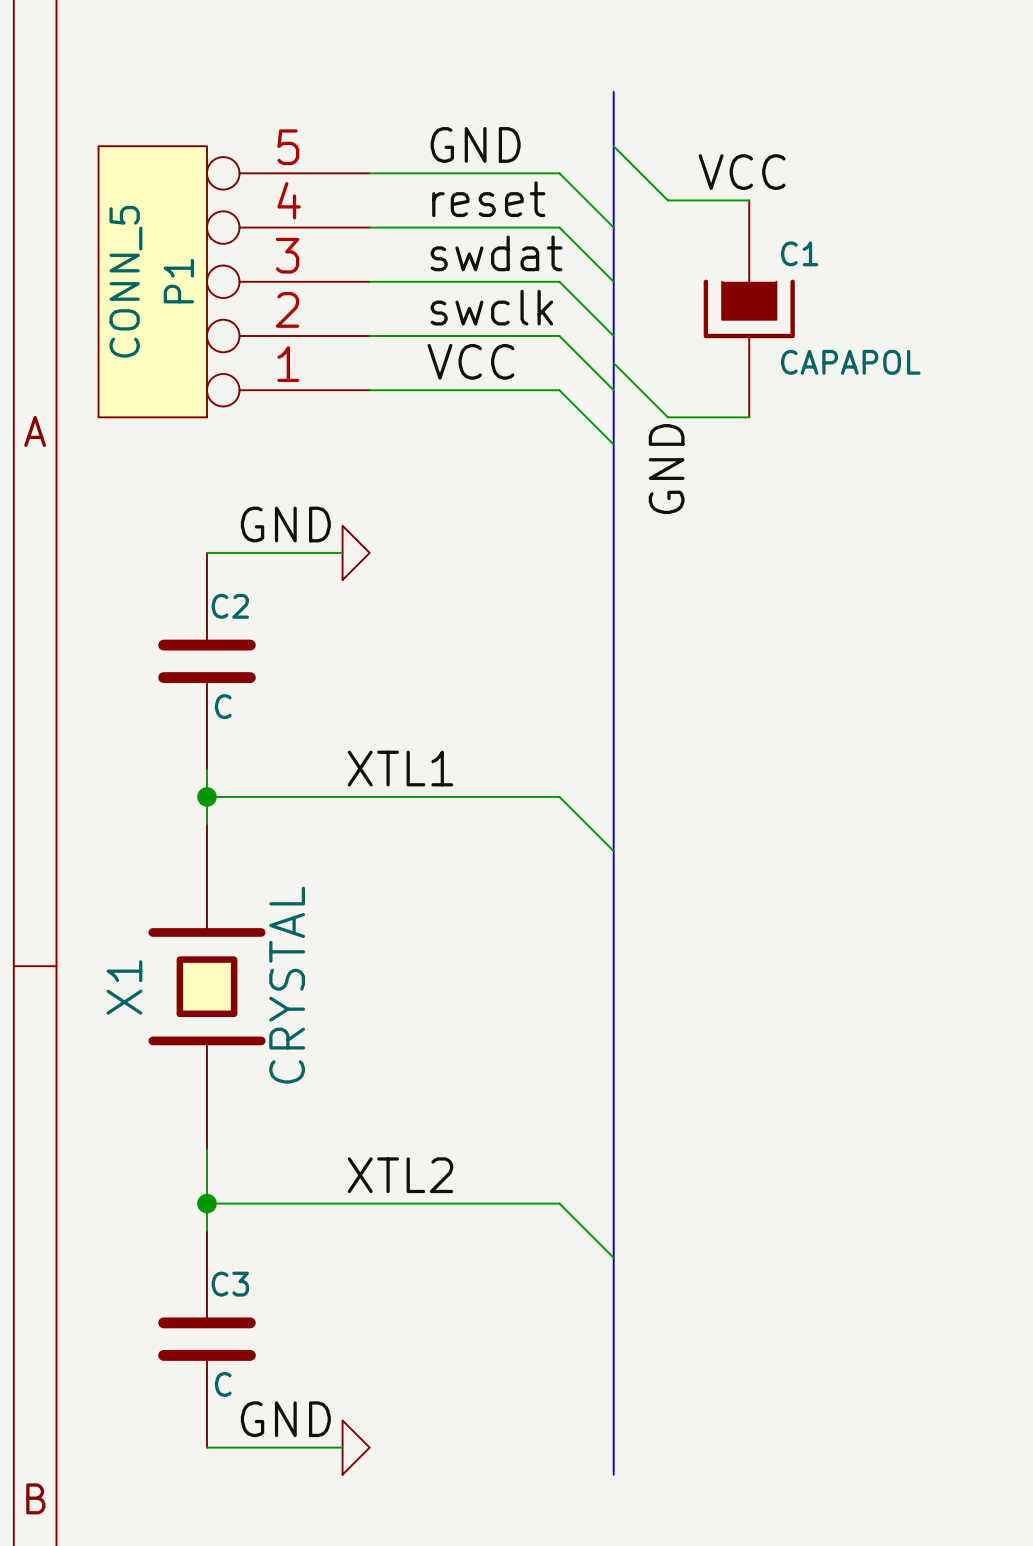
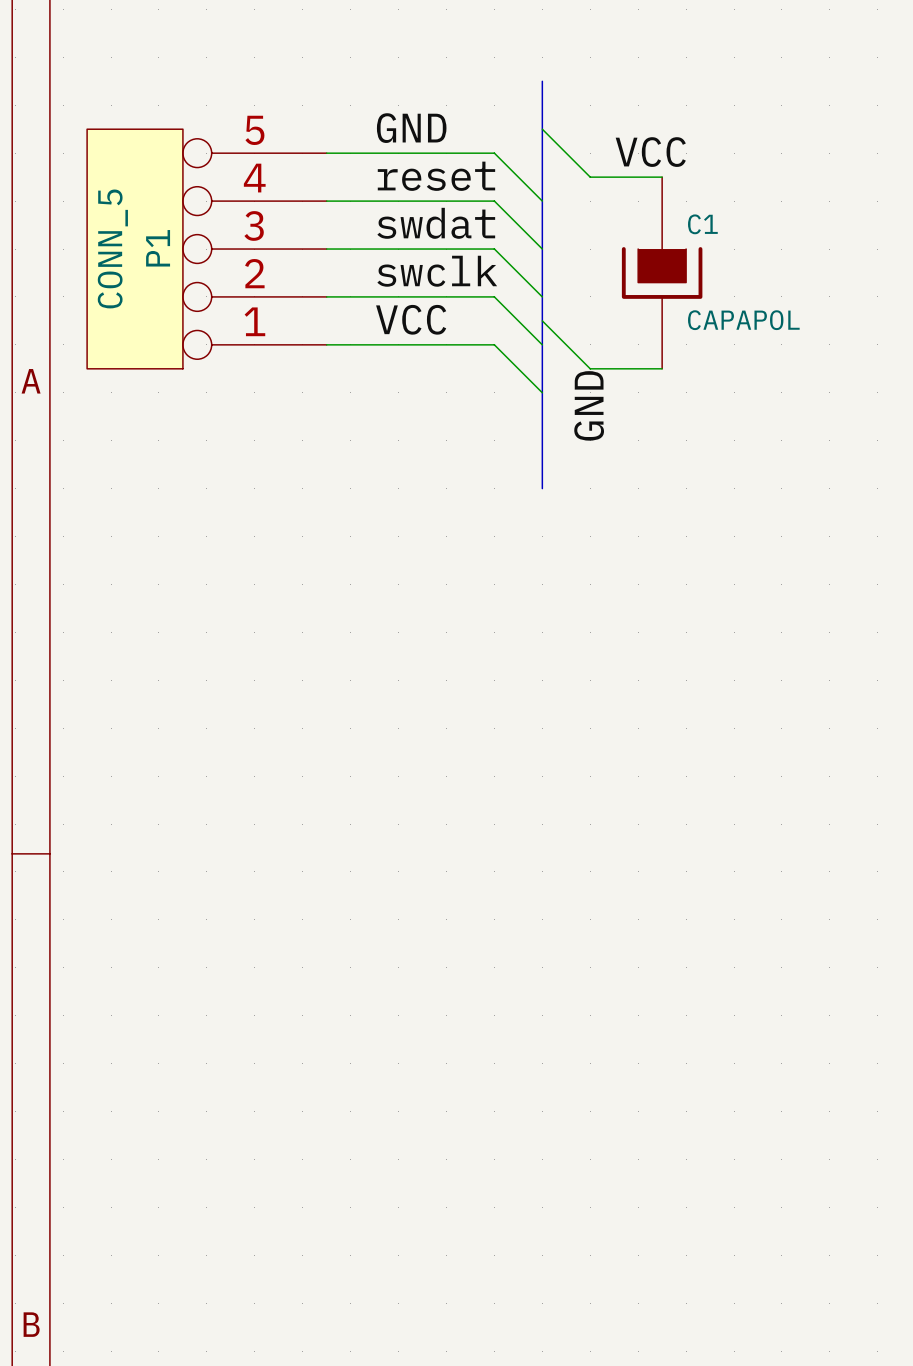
label: GND (285, 524) -> none
wire: (207, 552) (342, 552) -> none
power symbol: (356, 552) -> none
bus: (613, 552) (613, 1474) -> none
C2: C (207, 661) -> none
label: XTL1 (400, 768) -> none
wire: (207, 769) (207, 824) -> none
wire: (207, 796) (559, 796) (613, 851) -> none
junction: (207, 796) -> none
X1: CRYSTAL (207, 986) -> none
wire: (207, 1149) (207, 1230) -> none
label: XTL2 (400, 1175) -> none
wire: (207, 1203) (559, 1203) (613, 1257) -> none
junction: (207, 1203) -> none
C3: C (207, 1339) -> none
label: GND (285, 1419) -> none
wire: (207, 1447) (342, 1447) -> none
power symbol: (356, 1447) -> none

